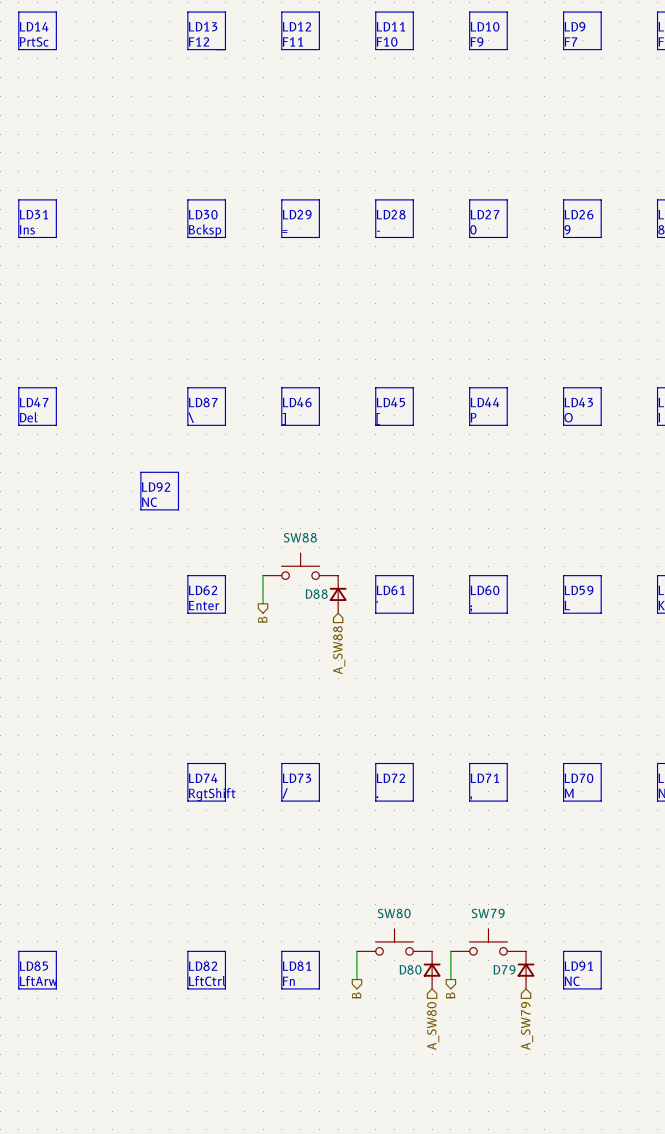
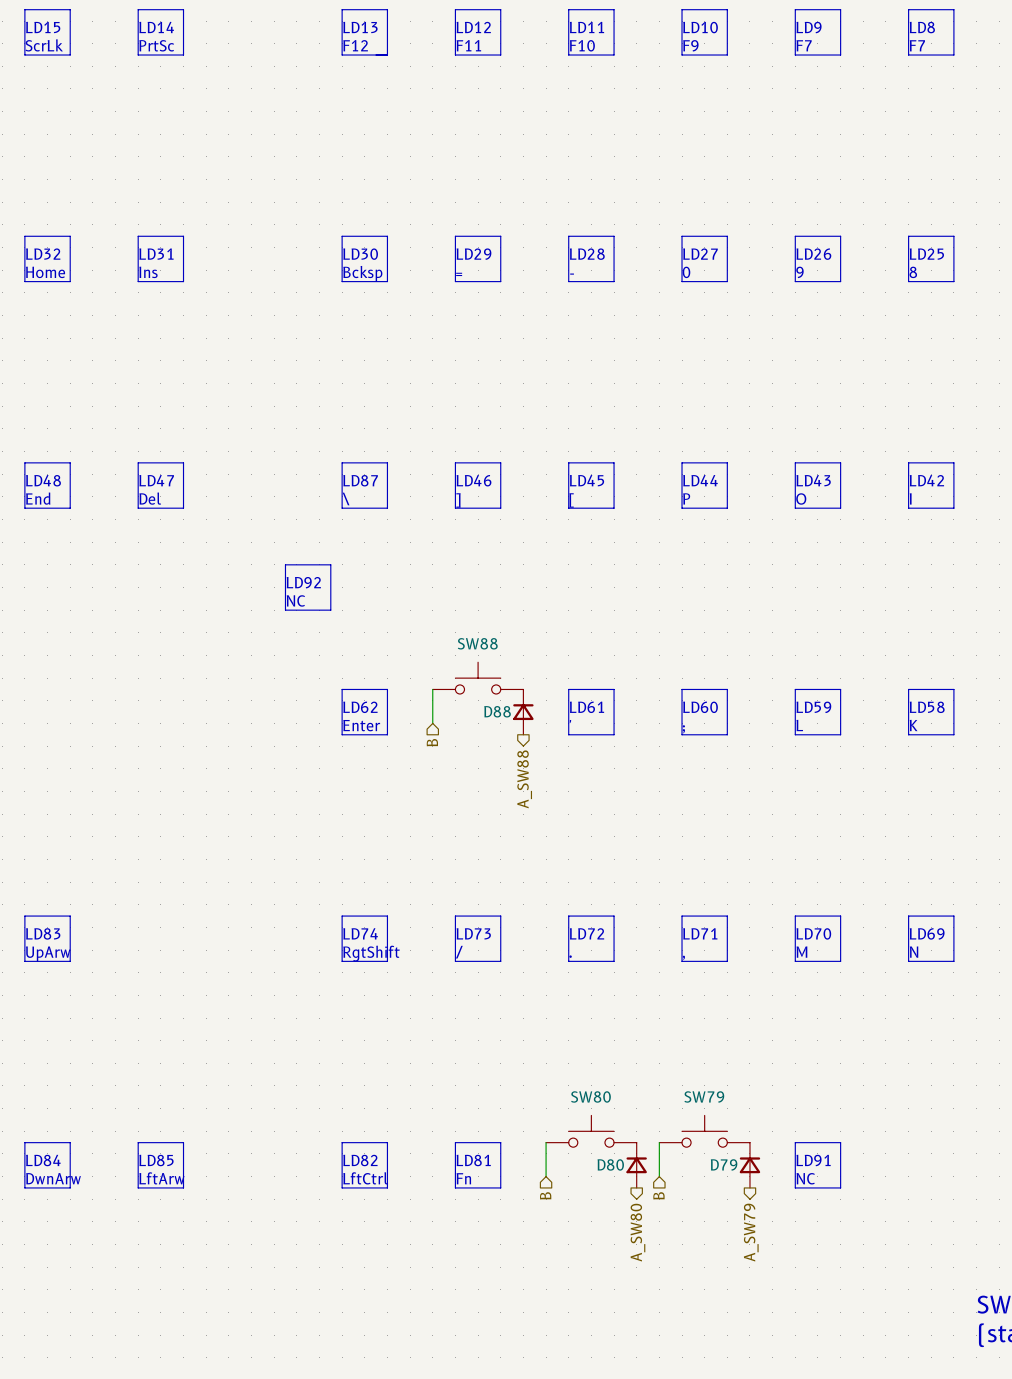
hierarchical label shape: output (262, 619) -> input (432, 742)
hierarchical label shape: input (339, 650) -> output (524, 779)
hierarchical label shape: output (356, 995) -> input (545, 1195)
hierarchical label shape: output (450, 995) -> input (658, 1195)
hierarchical label shape: input (433, 1025) -> output (637, 1232)
hierarchical label shape: input (527, 1025) -> output (751, 1232)

